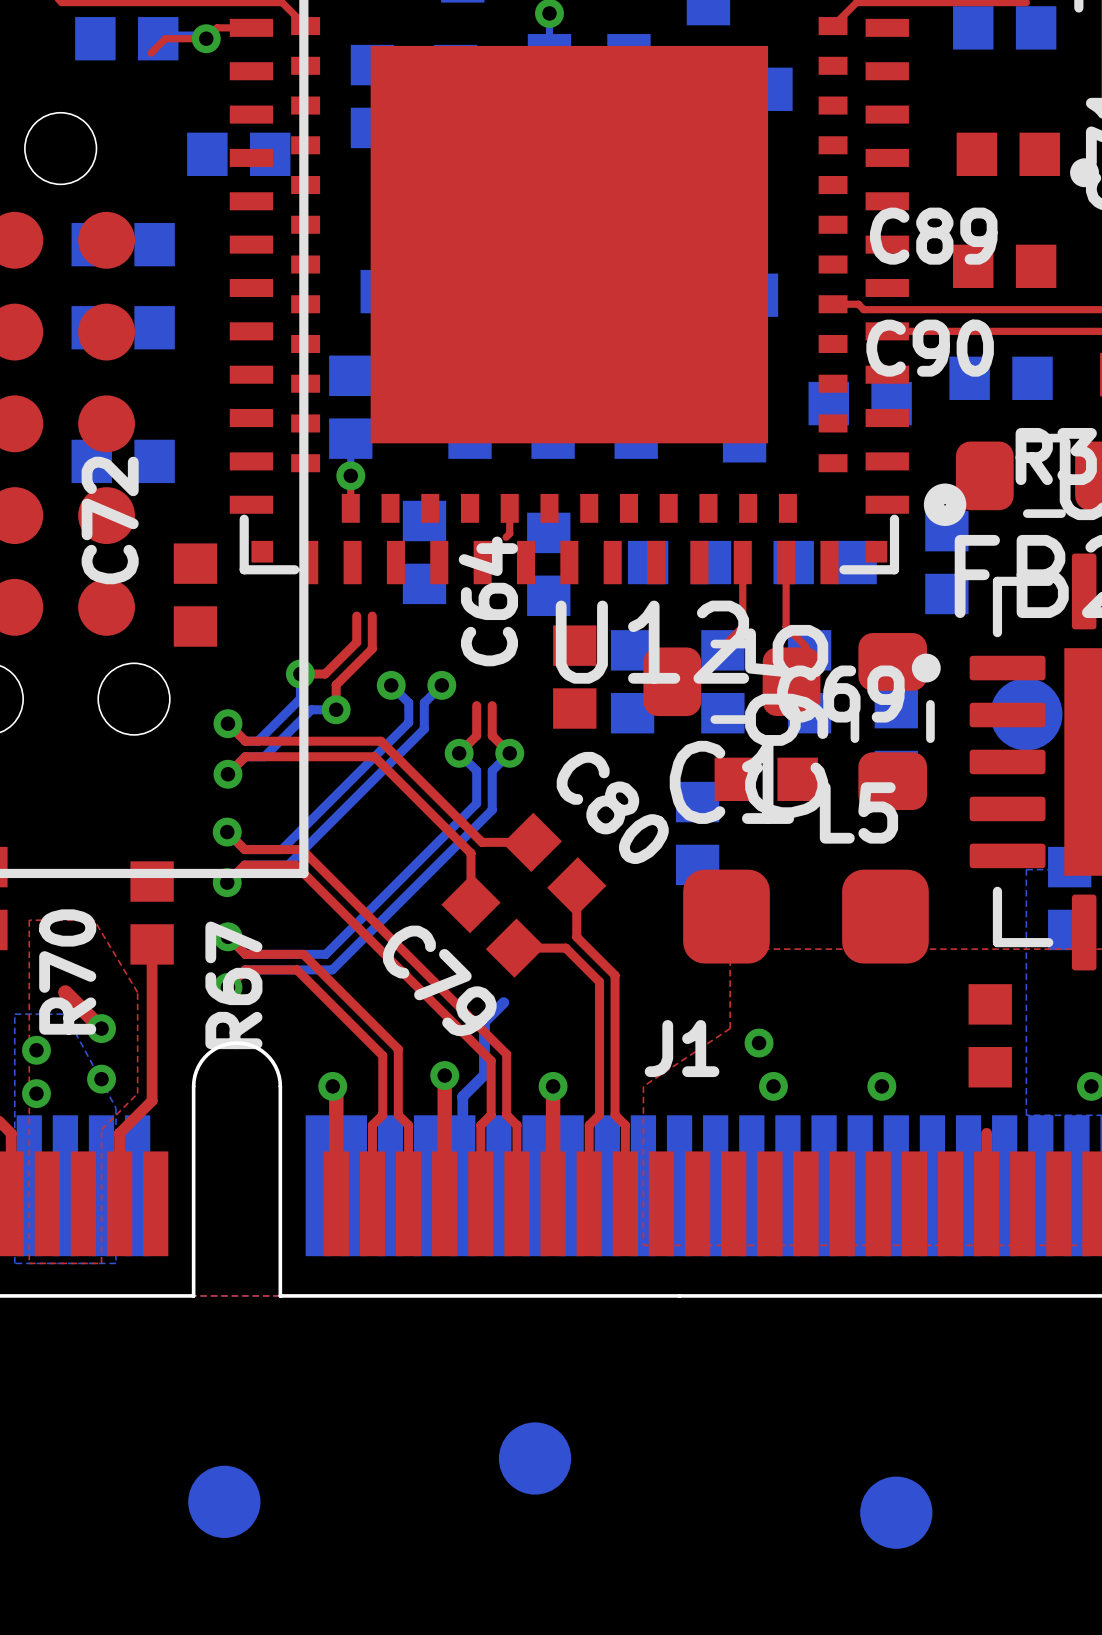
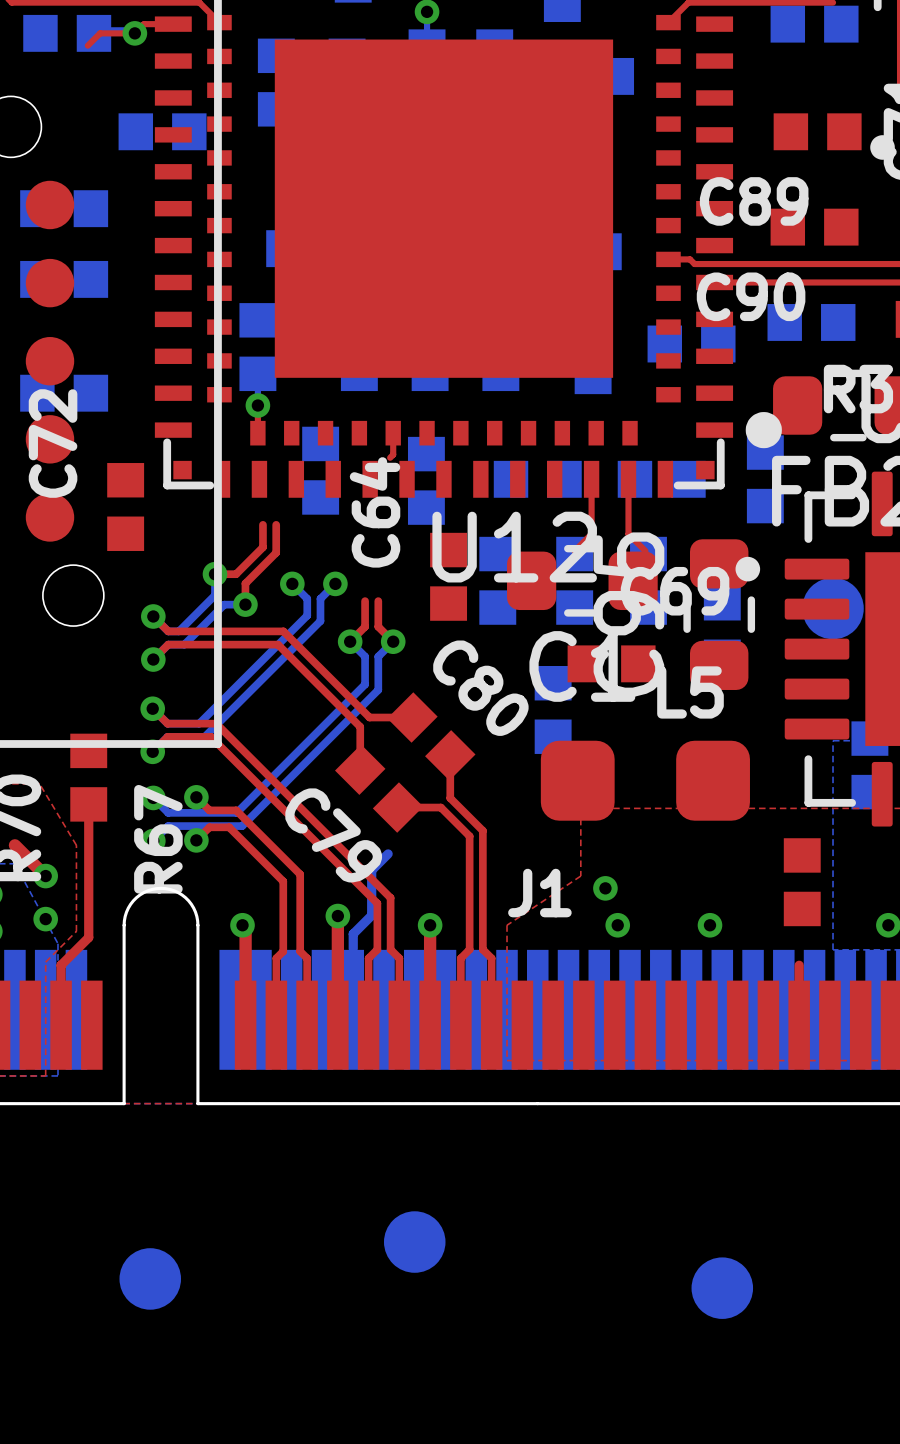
top track: (227, 936) (245, 954) (303, 954) (398, 1049) (398, 1114) (400, 1117) -> (196, 797) (209, 810) (236, 810) (300, 874) (300, 951)
via: none -> (196, 797)
via: none -> (196, 840)
top track: (227, 987) (245, 969) (296, 969) (382, 1055) (382, 1114) (380, 1117) -> (196, 840) (209, 827) (229, 827) (283, 881) (283, 951)

